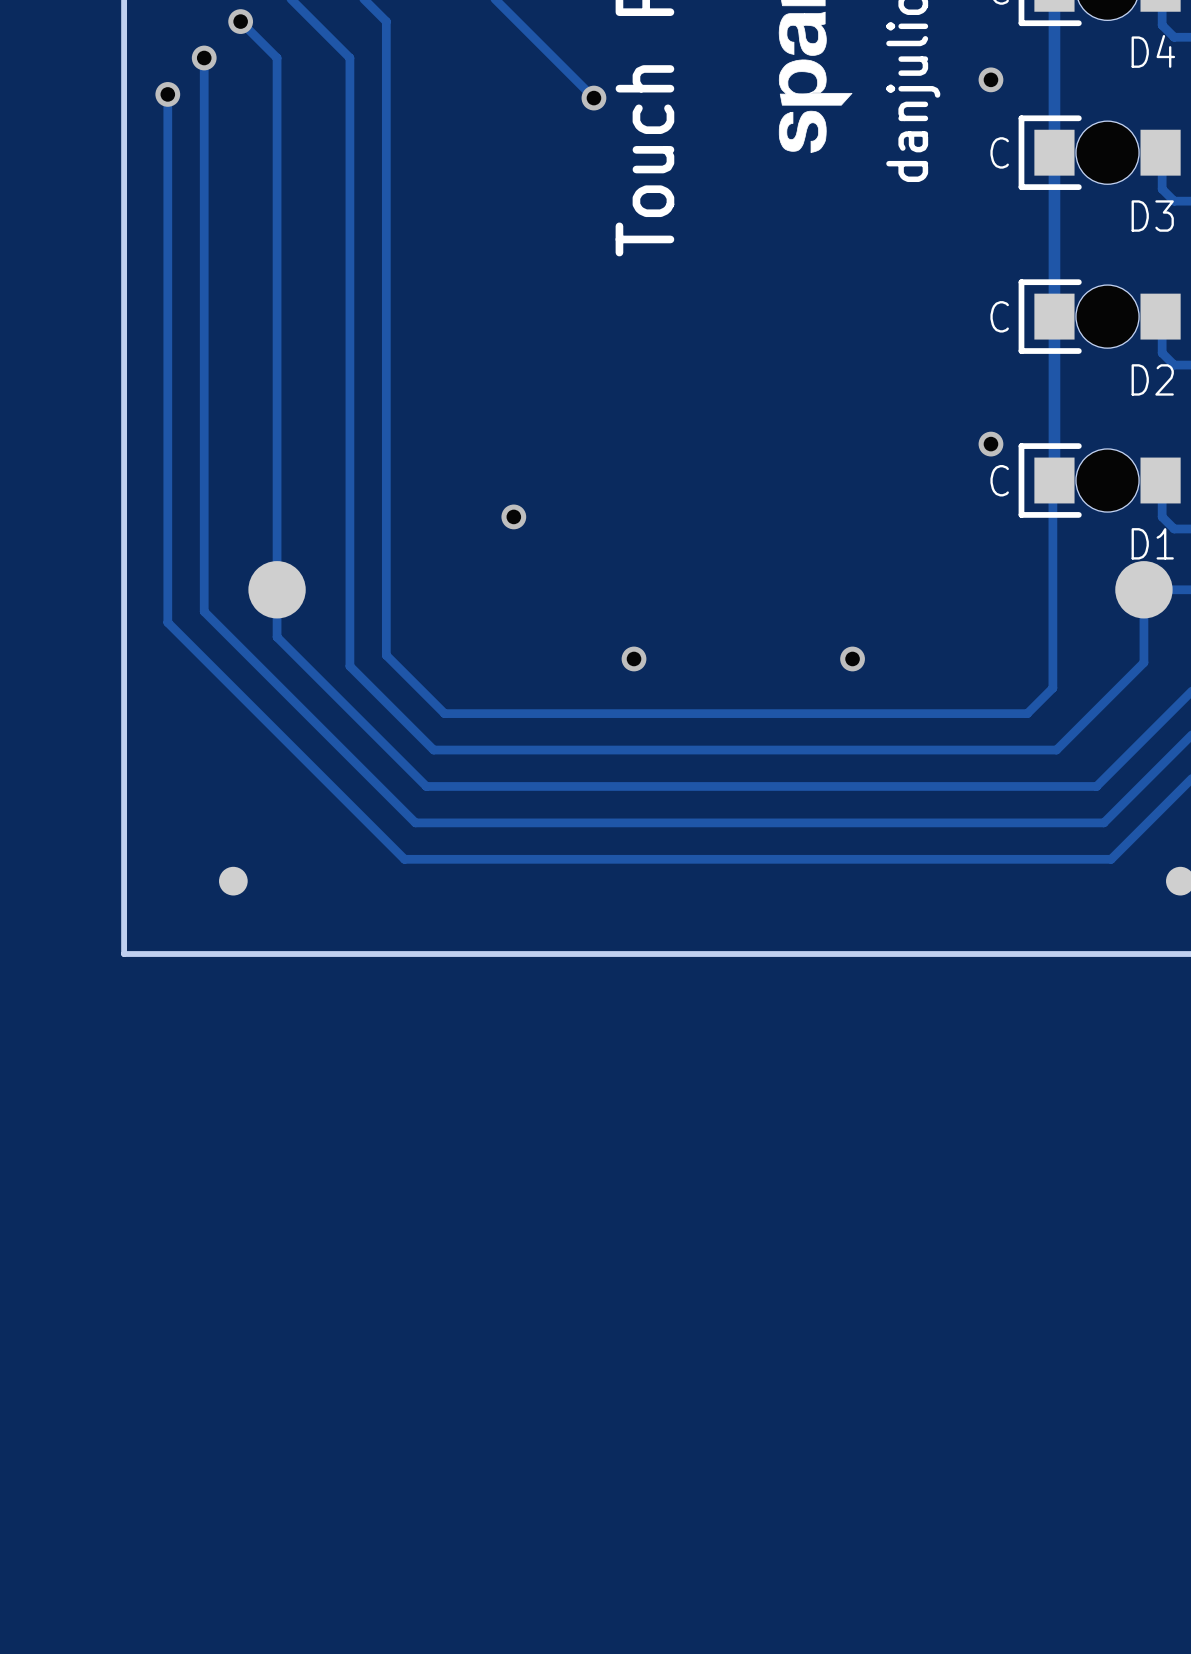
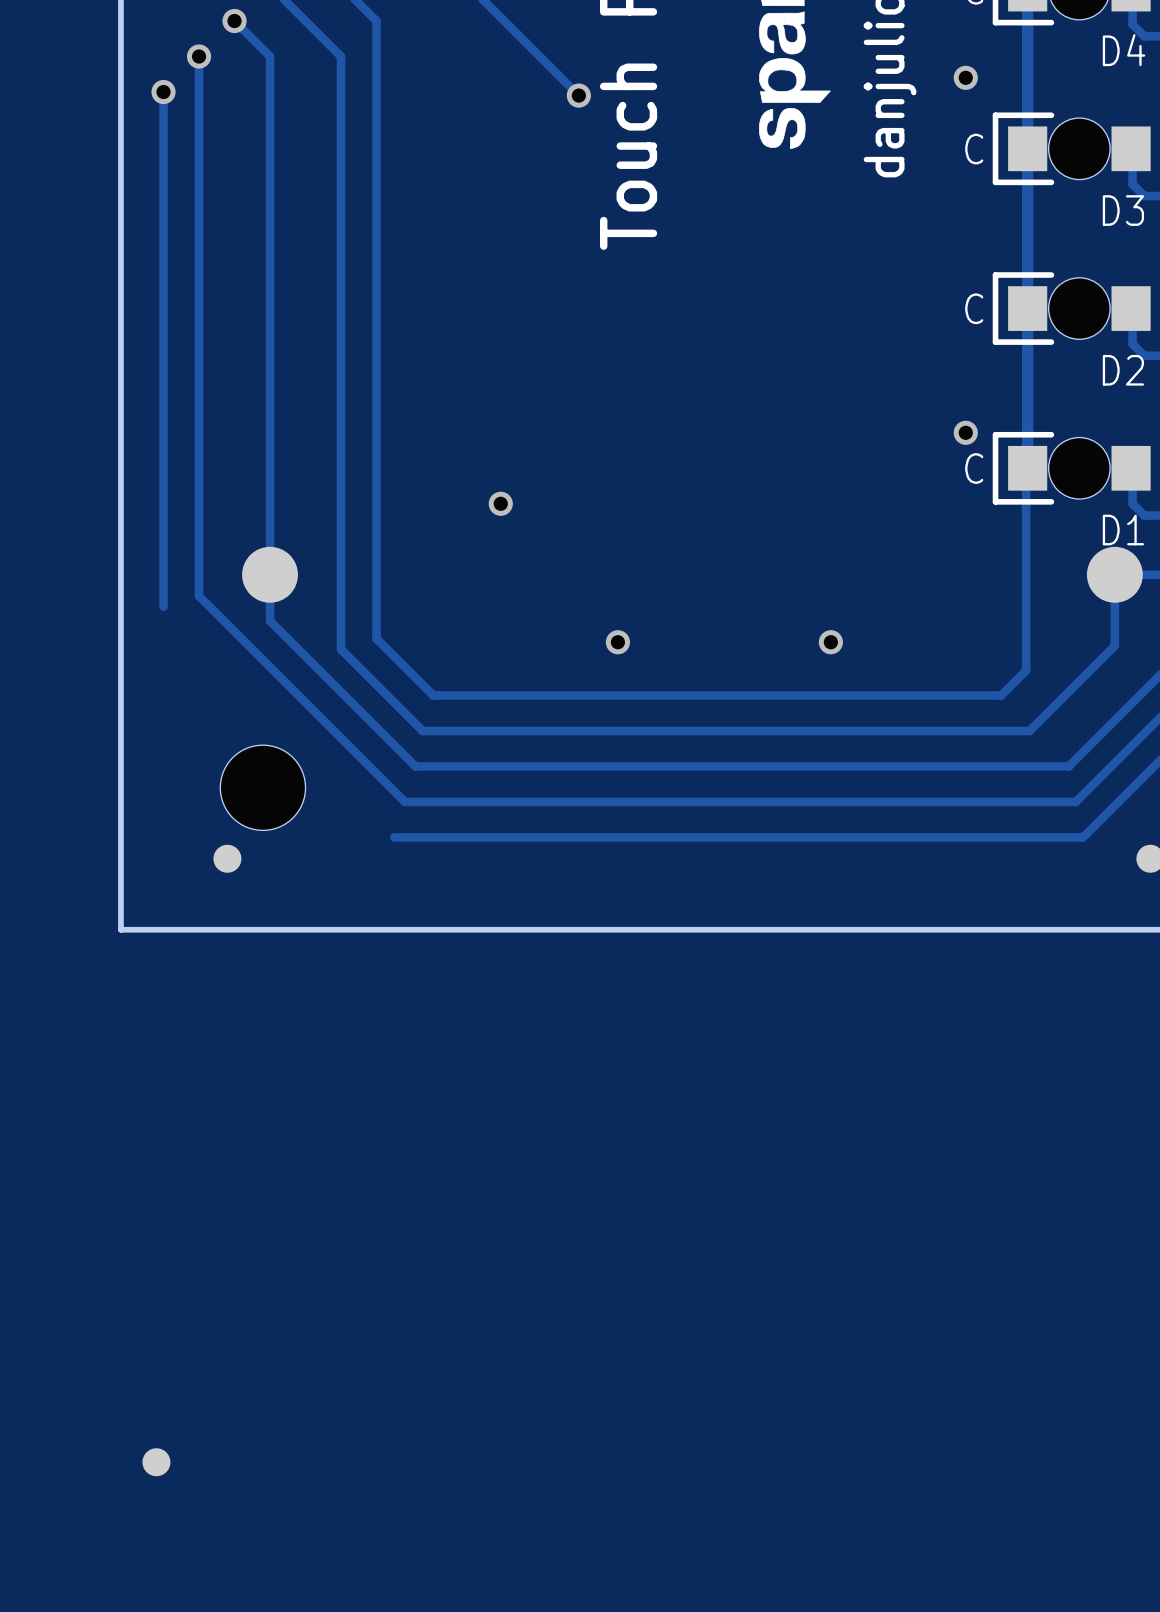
track: (167, 622) (404, 859) -> none
part: none -> (262, 787)
part: none -> (156, 1462)

